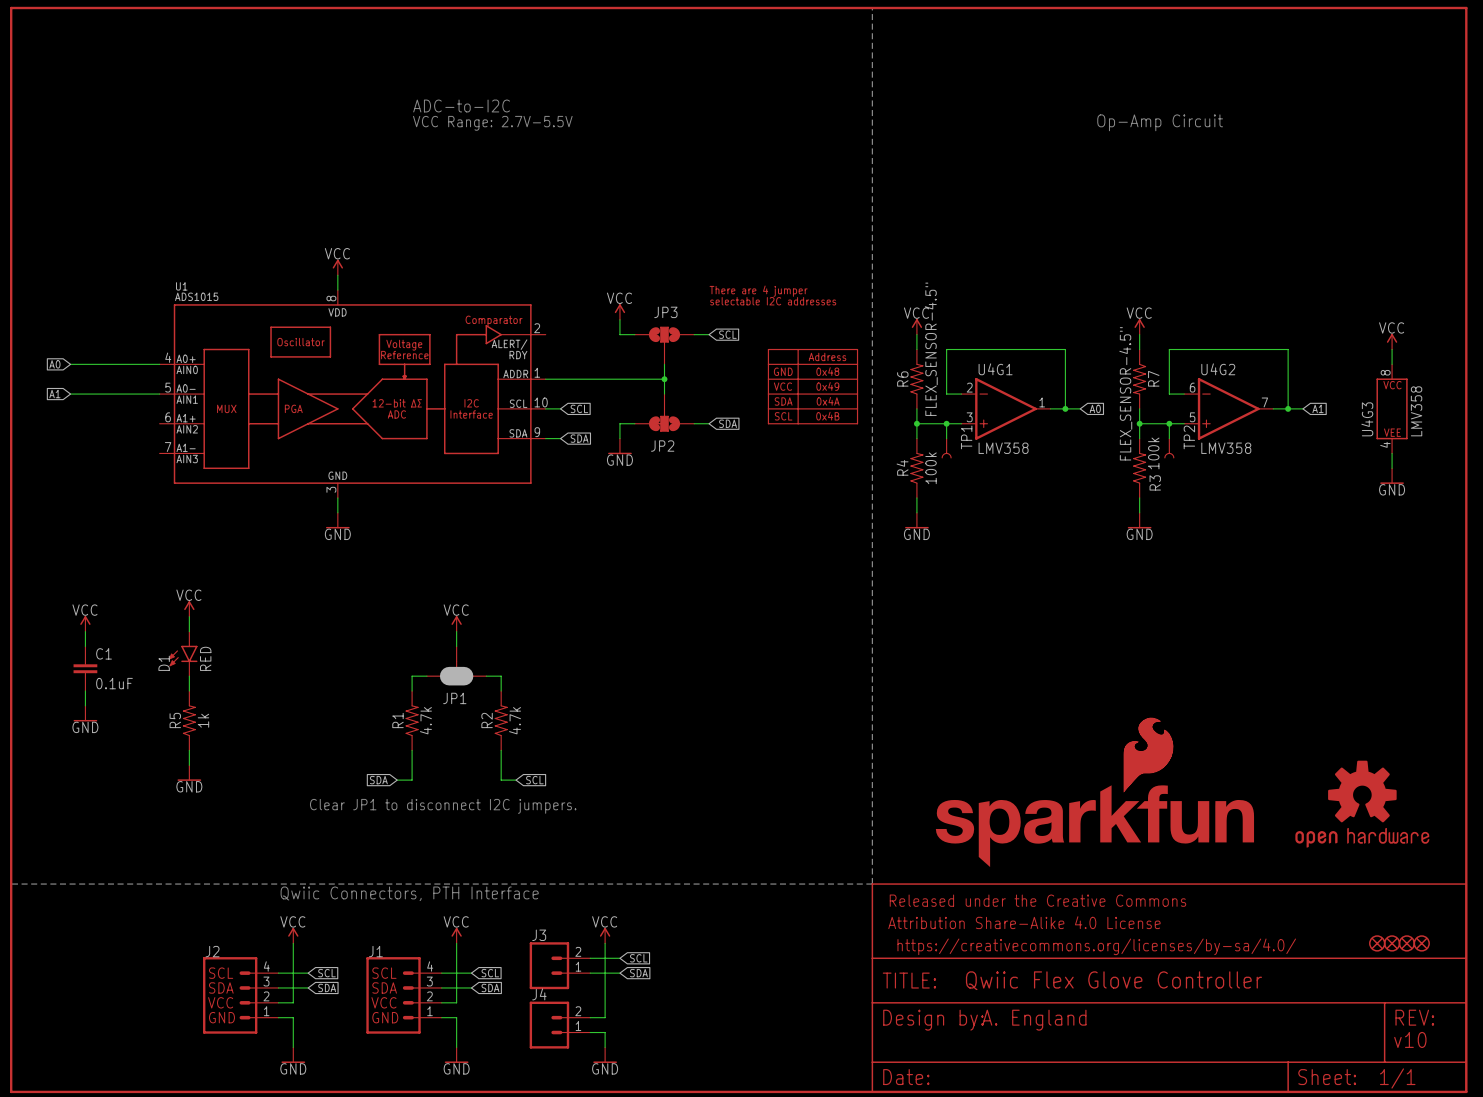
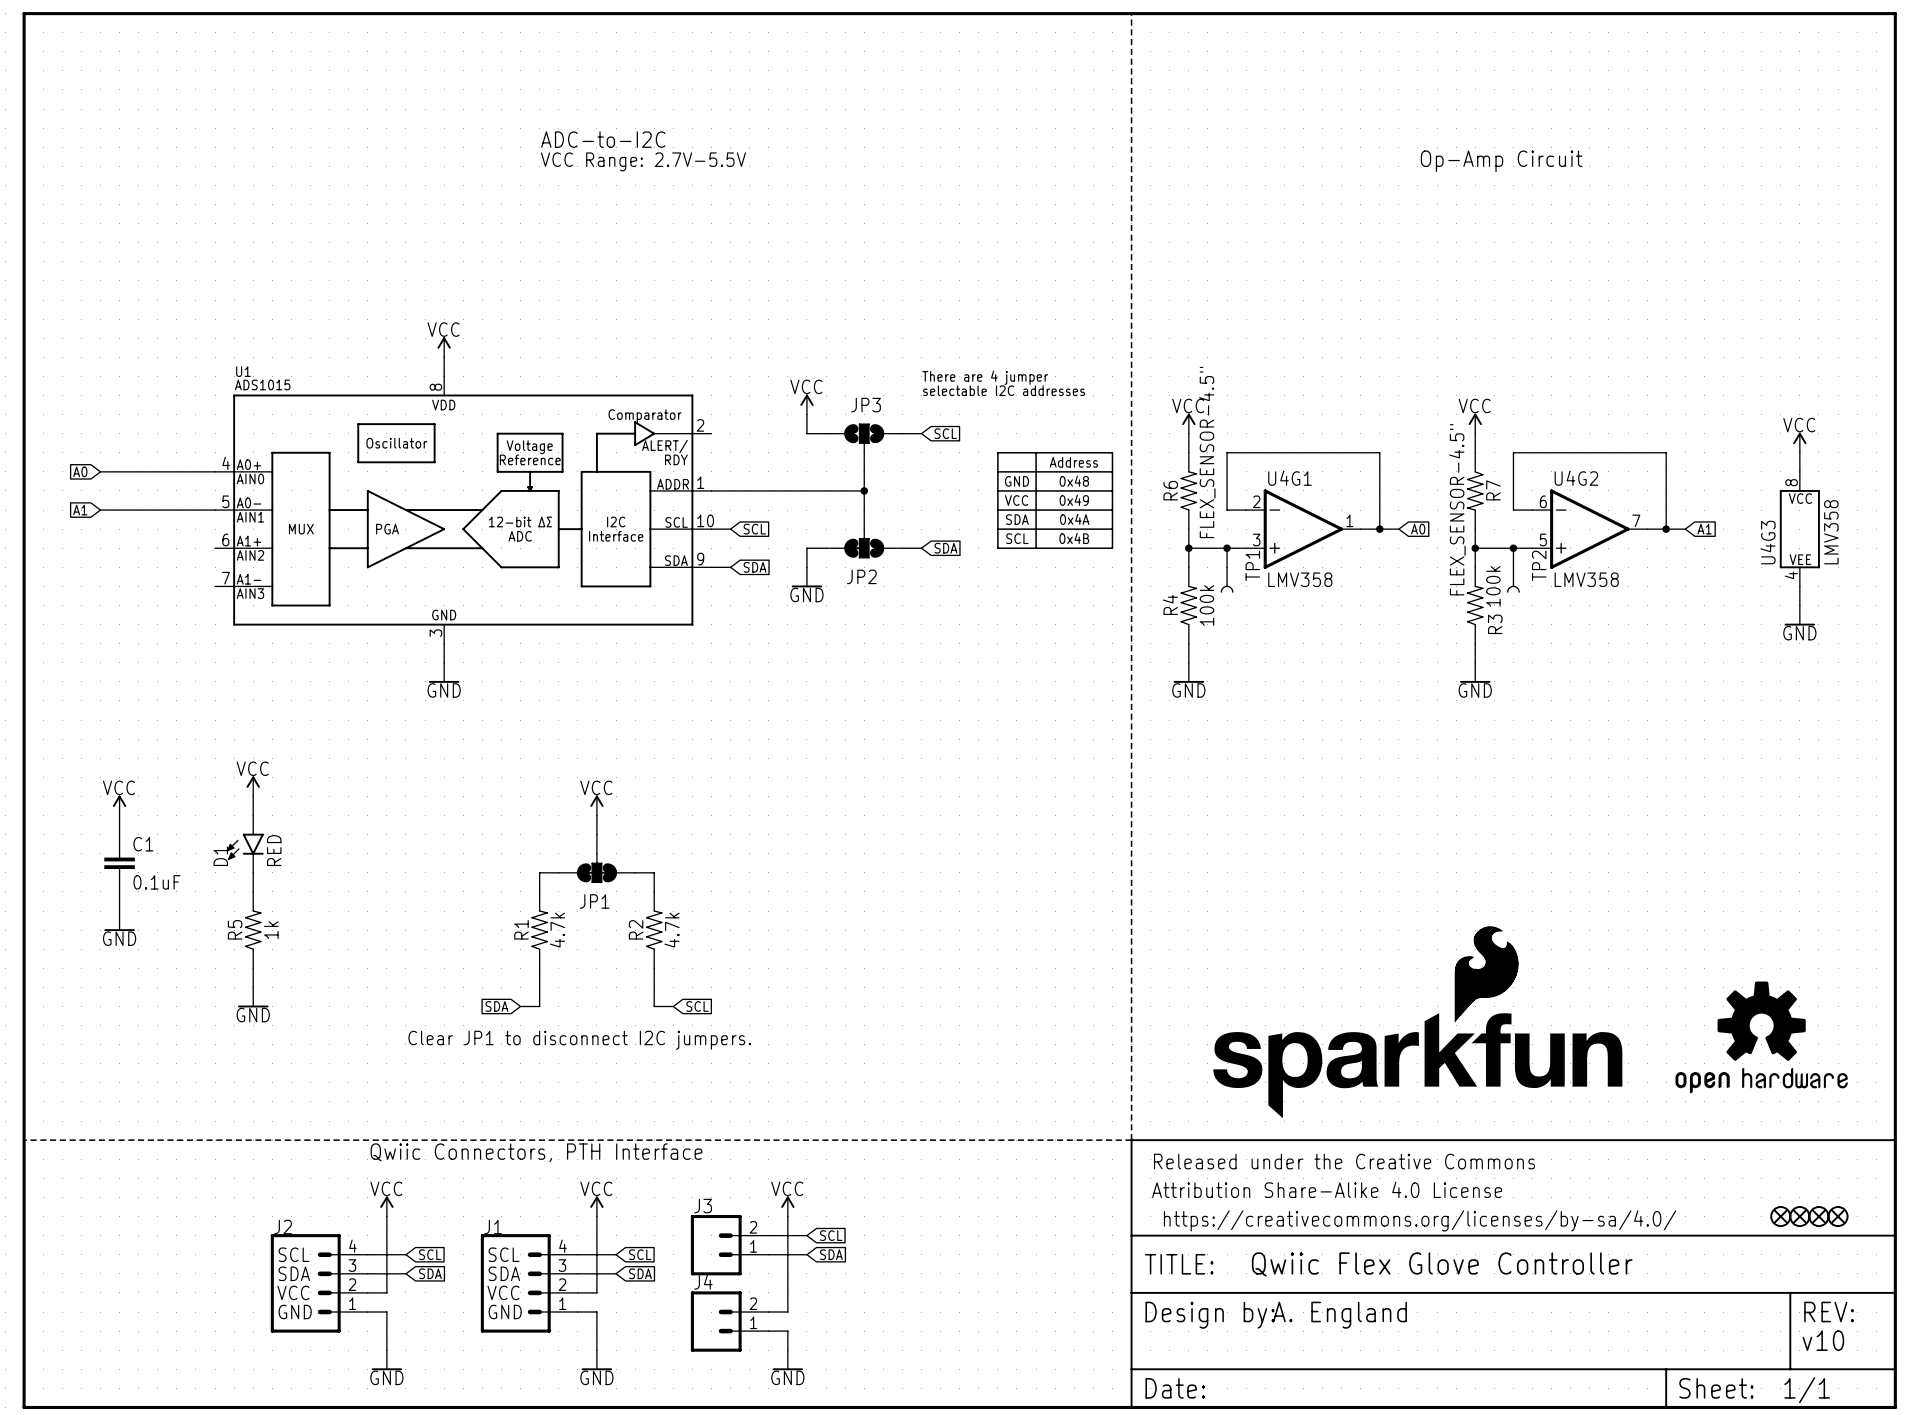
JP1 symbol: [426, 646, 487, 686] -> [558, 834, 636, 883]

